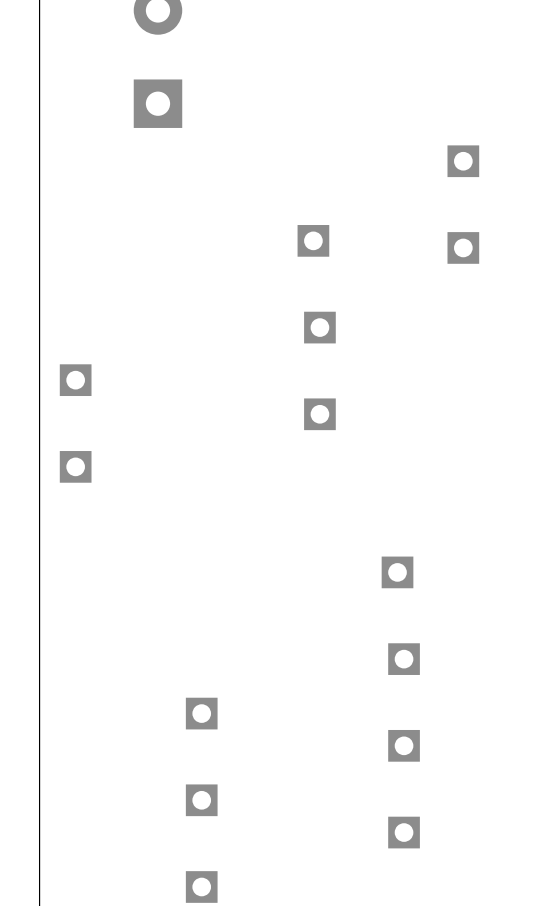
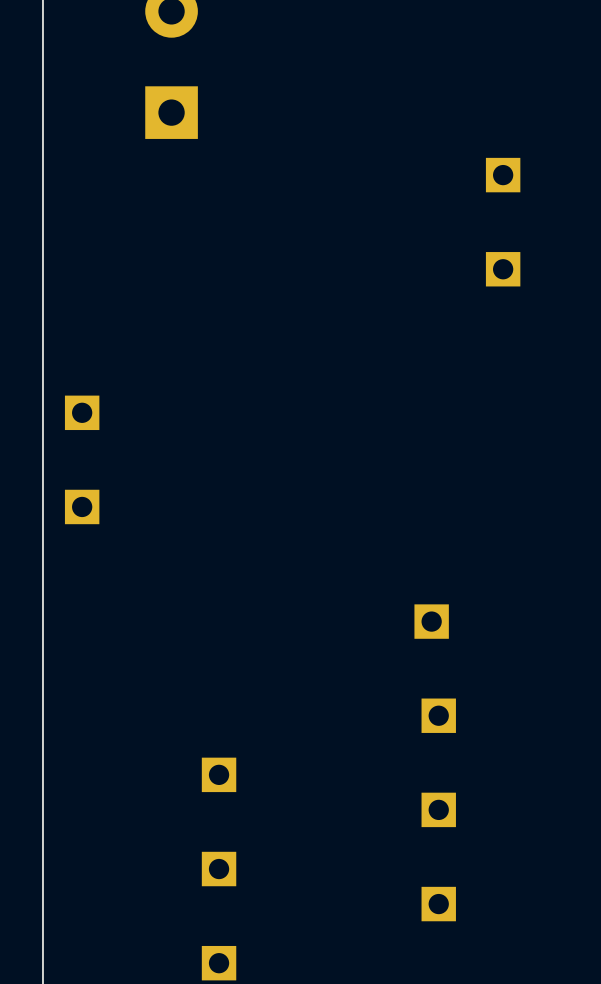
part: (313, 240) -> none
part: (319, 327) -> none
part: (319, 414) -> none

